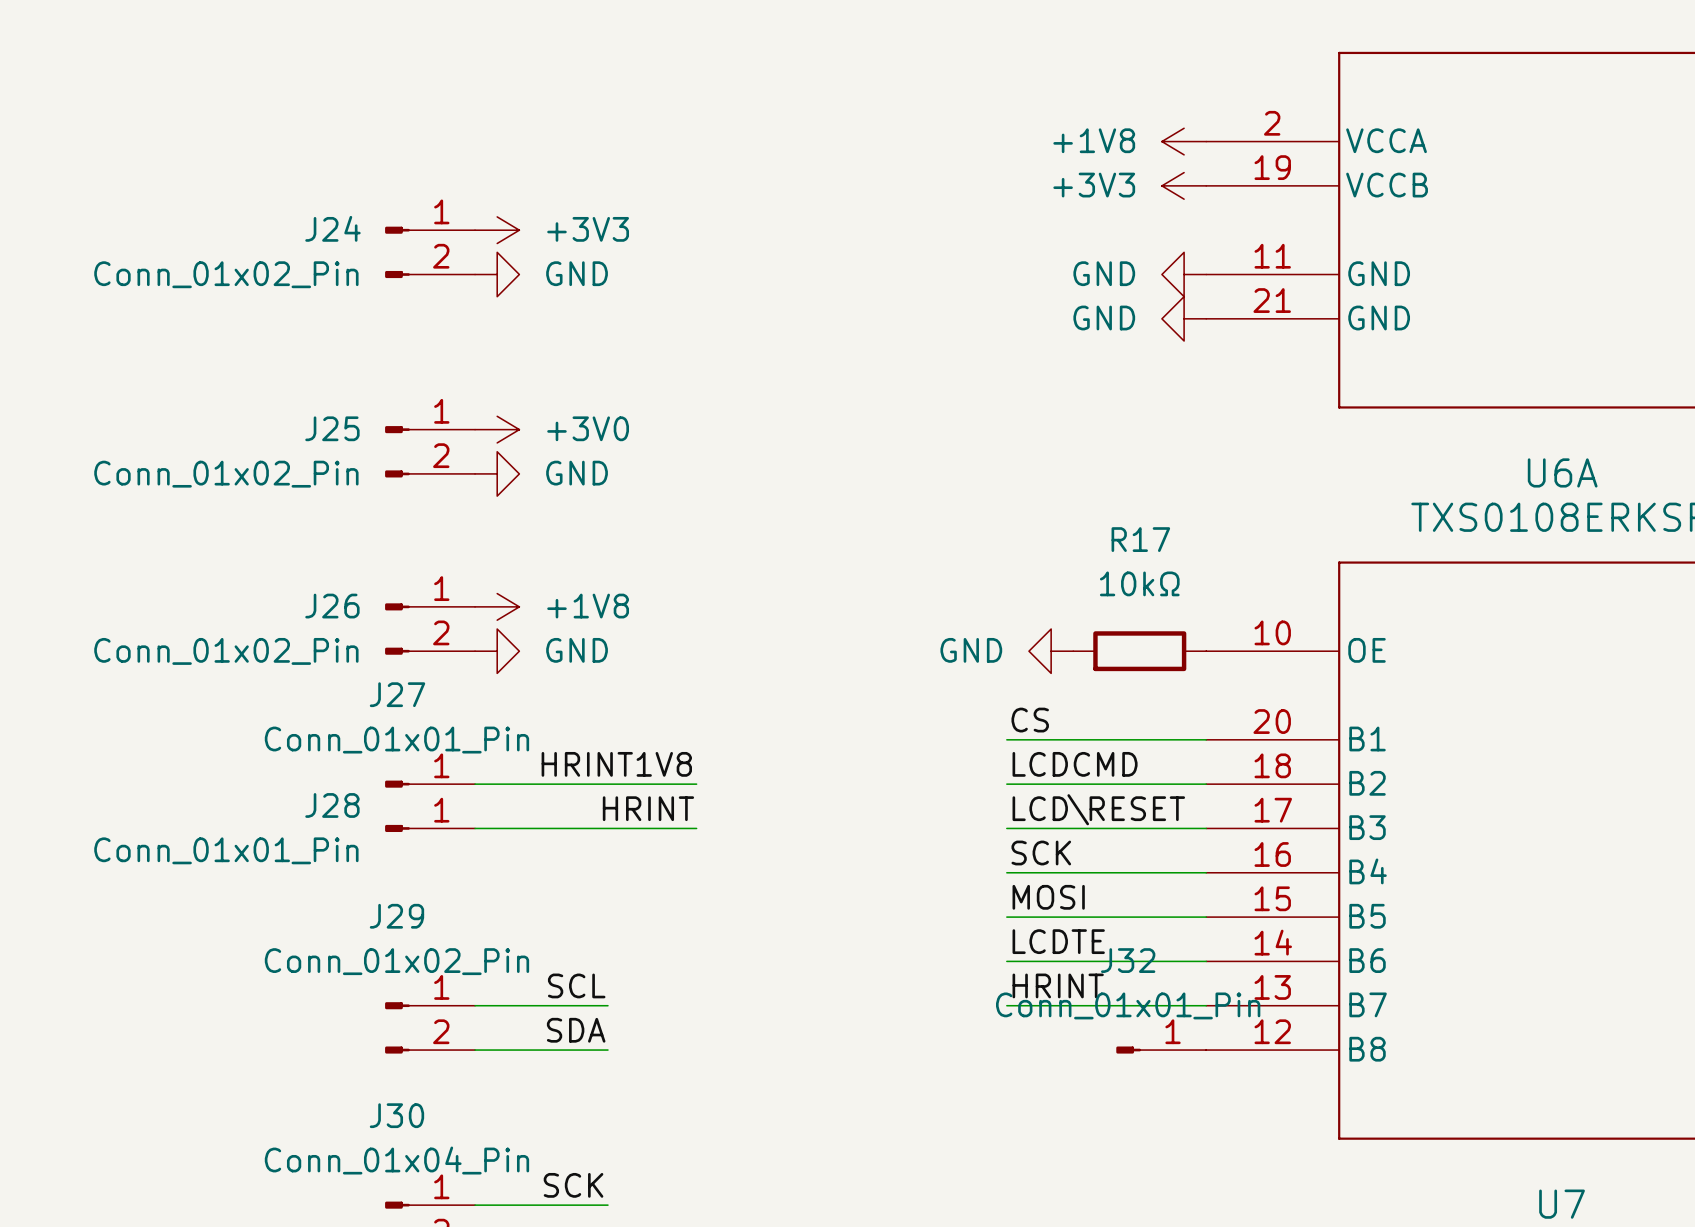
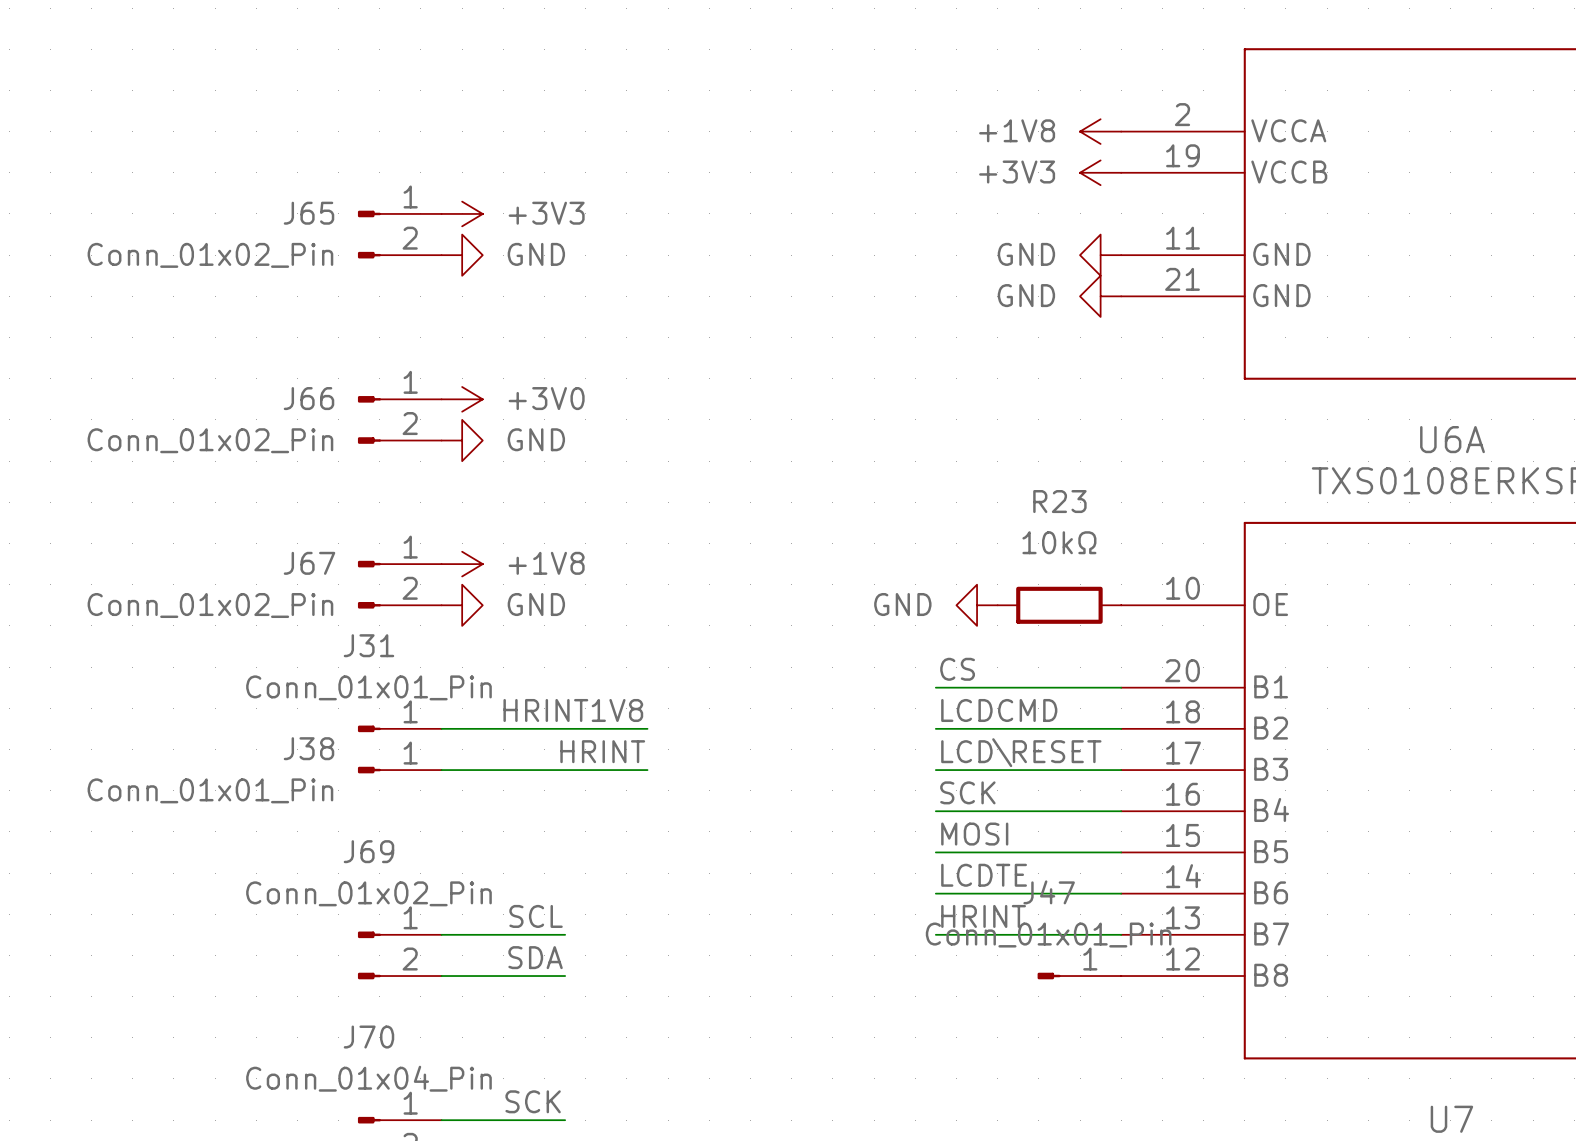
J24 name: J24 (332, 228) -> J65 (309, 213)
J25 name: J25 (332, 428) -> J66 (309, 398)
R17 name: R17 (1140, 539) -> R23 (1059, 501)
J26 name: J26 (332, 606) -> J67 (309, 563)
J27 name: J27 (397, 694) -> J31 (368, 645)
J28 name: J28 (332, 805) -> J38 (309, 748)
J29 name: J29 (396, 916) -> J69 (368, 851)
J32 name: J32 (1128, 960) -> J47 (1049, 892)
J30 name: J30 (396, 1115) -> J70 (368, 1037)

